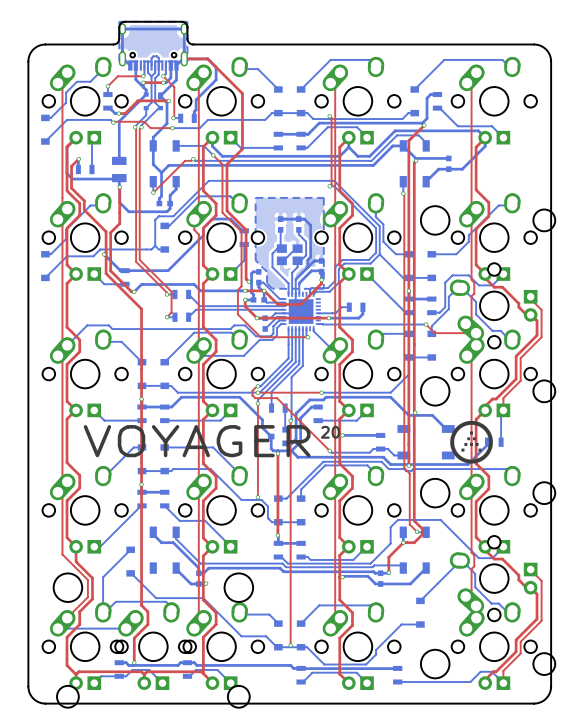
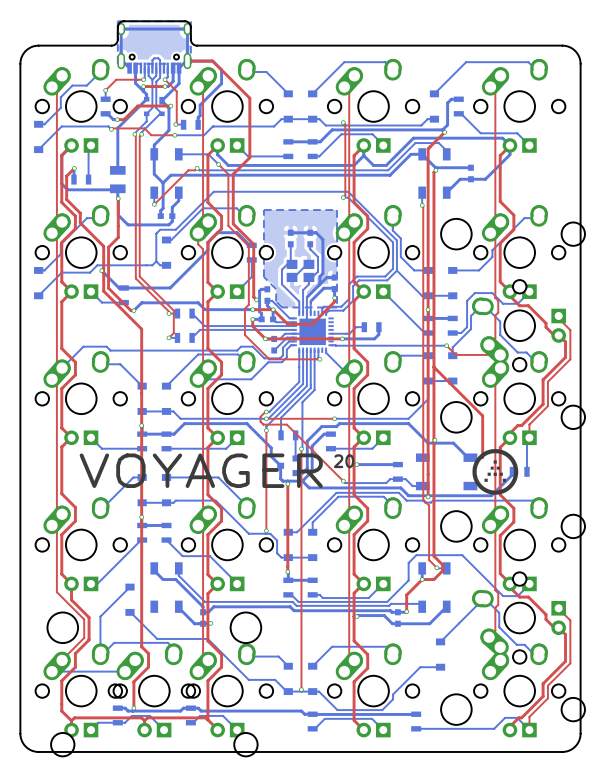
top track: none -> (433, 367) (482, 415) (482, 457)

